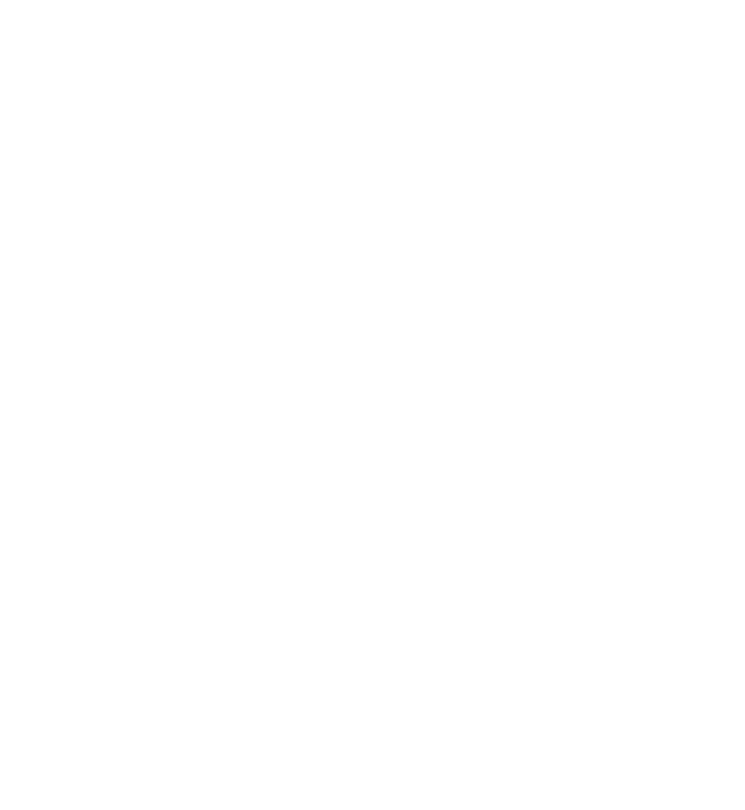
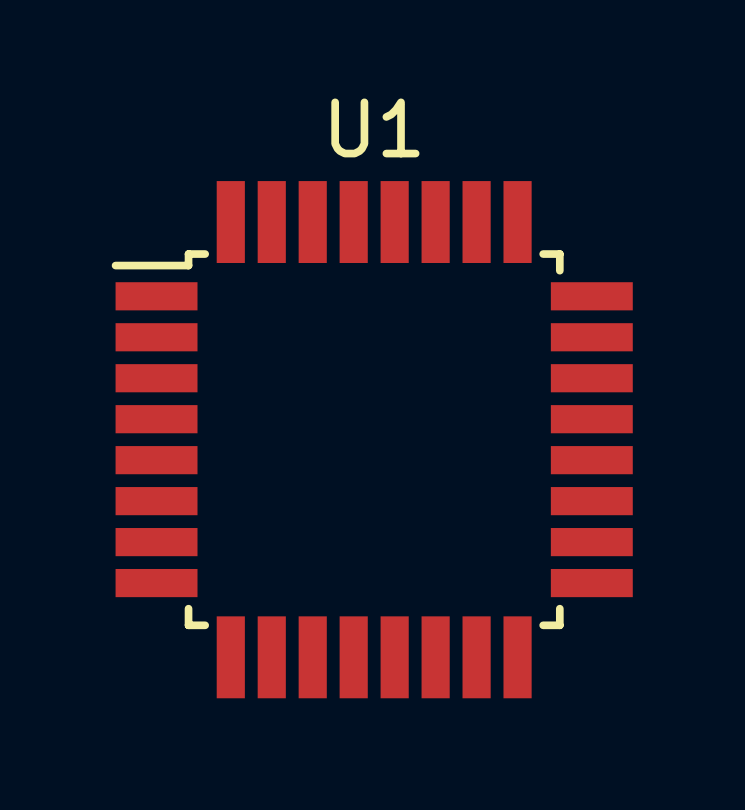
U1: none -> (372, 439)

